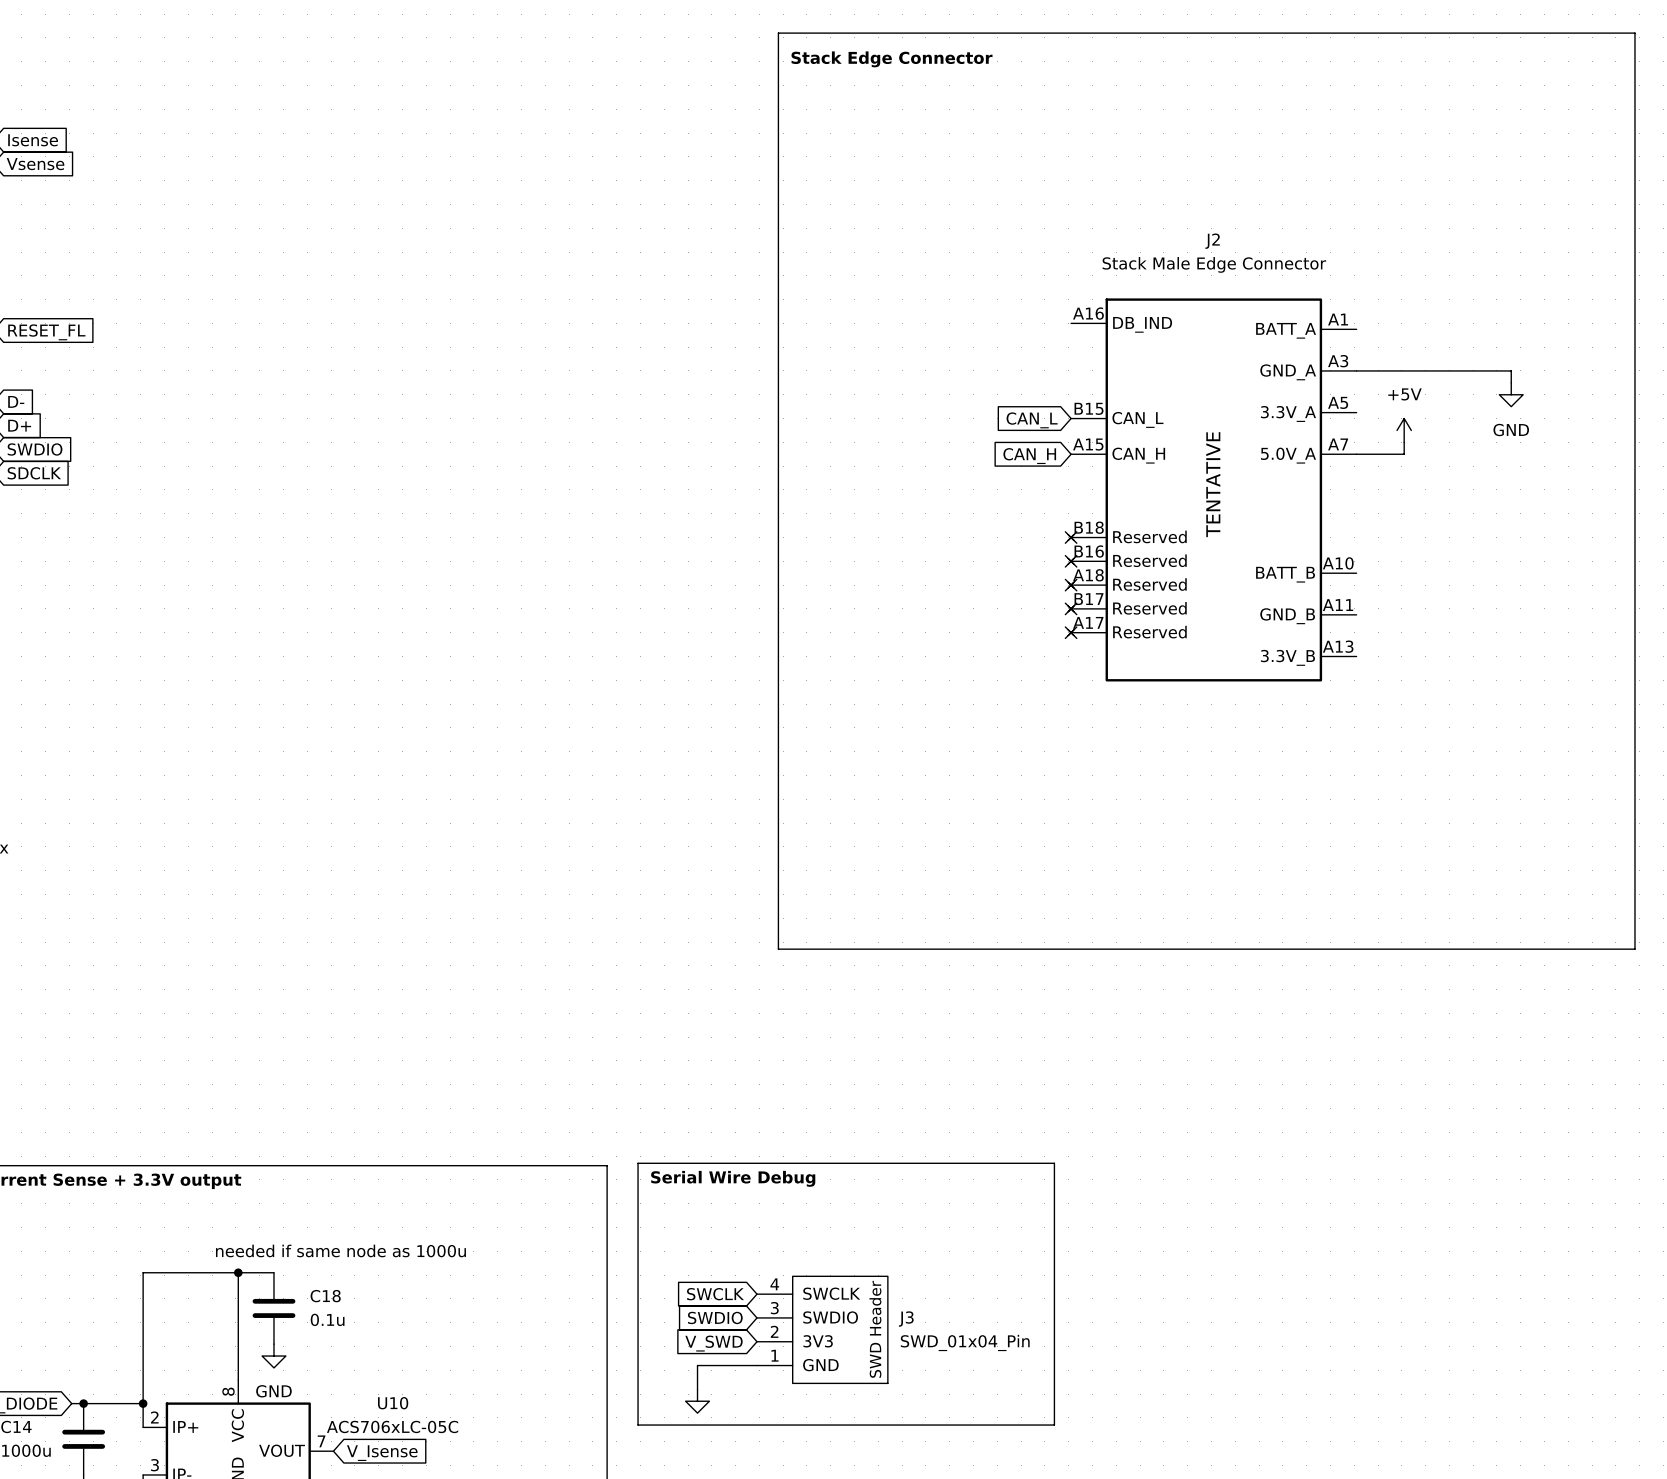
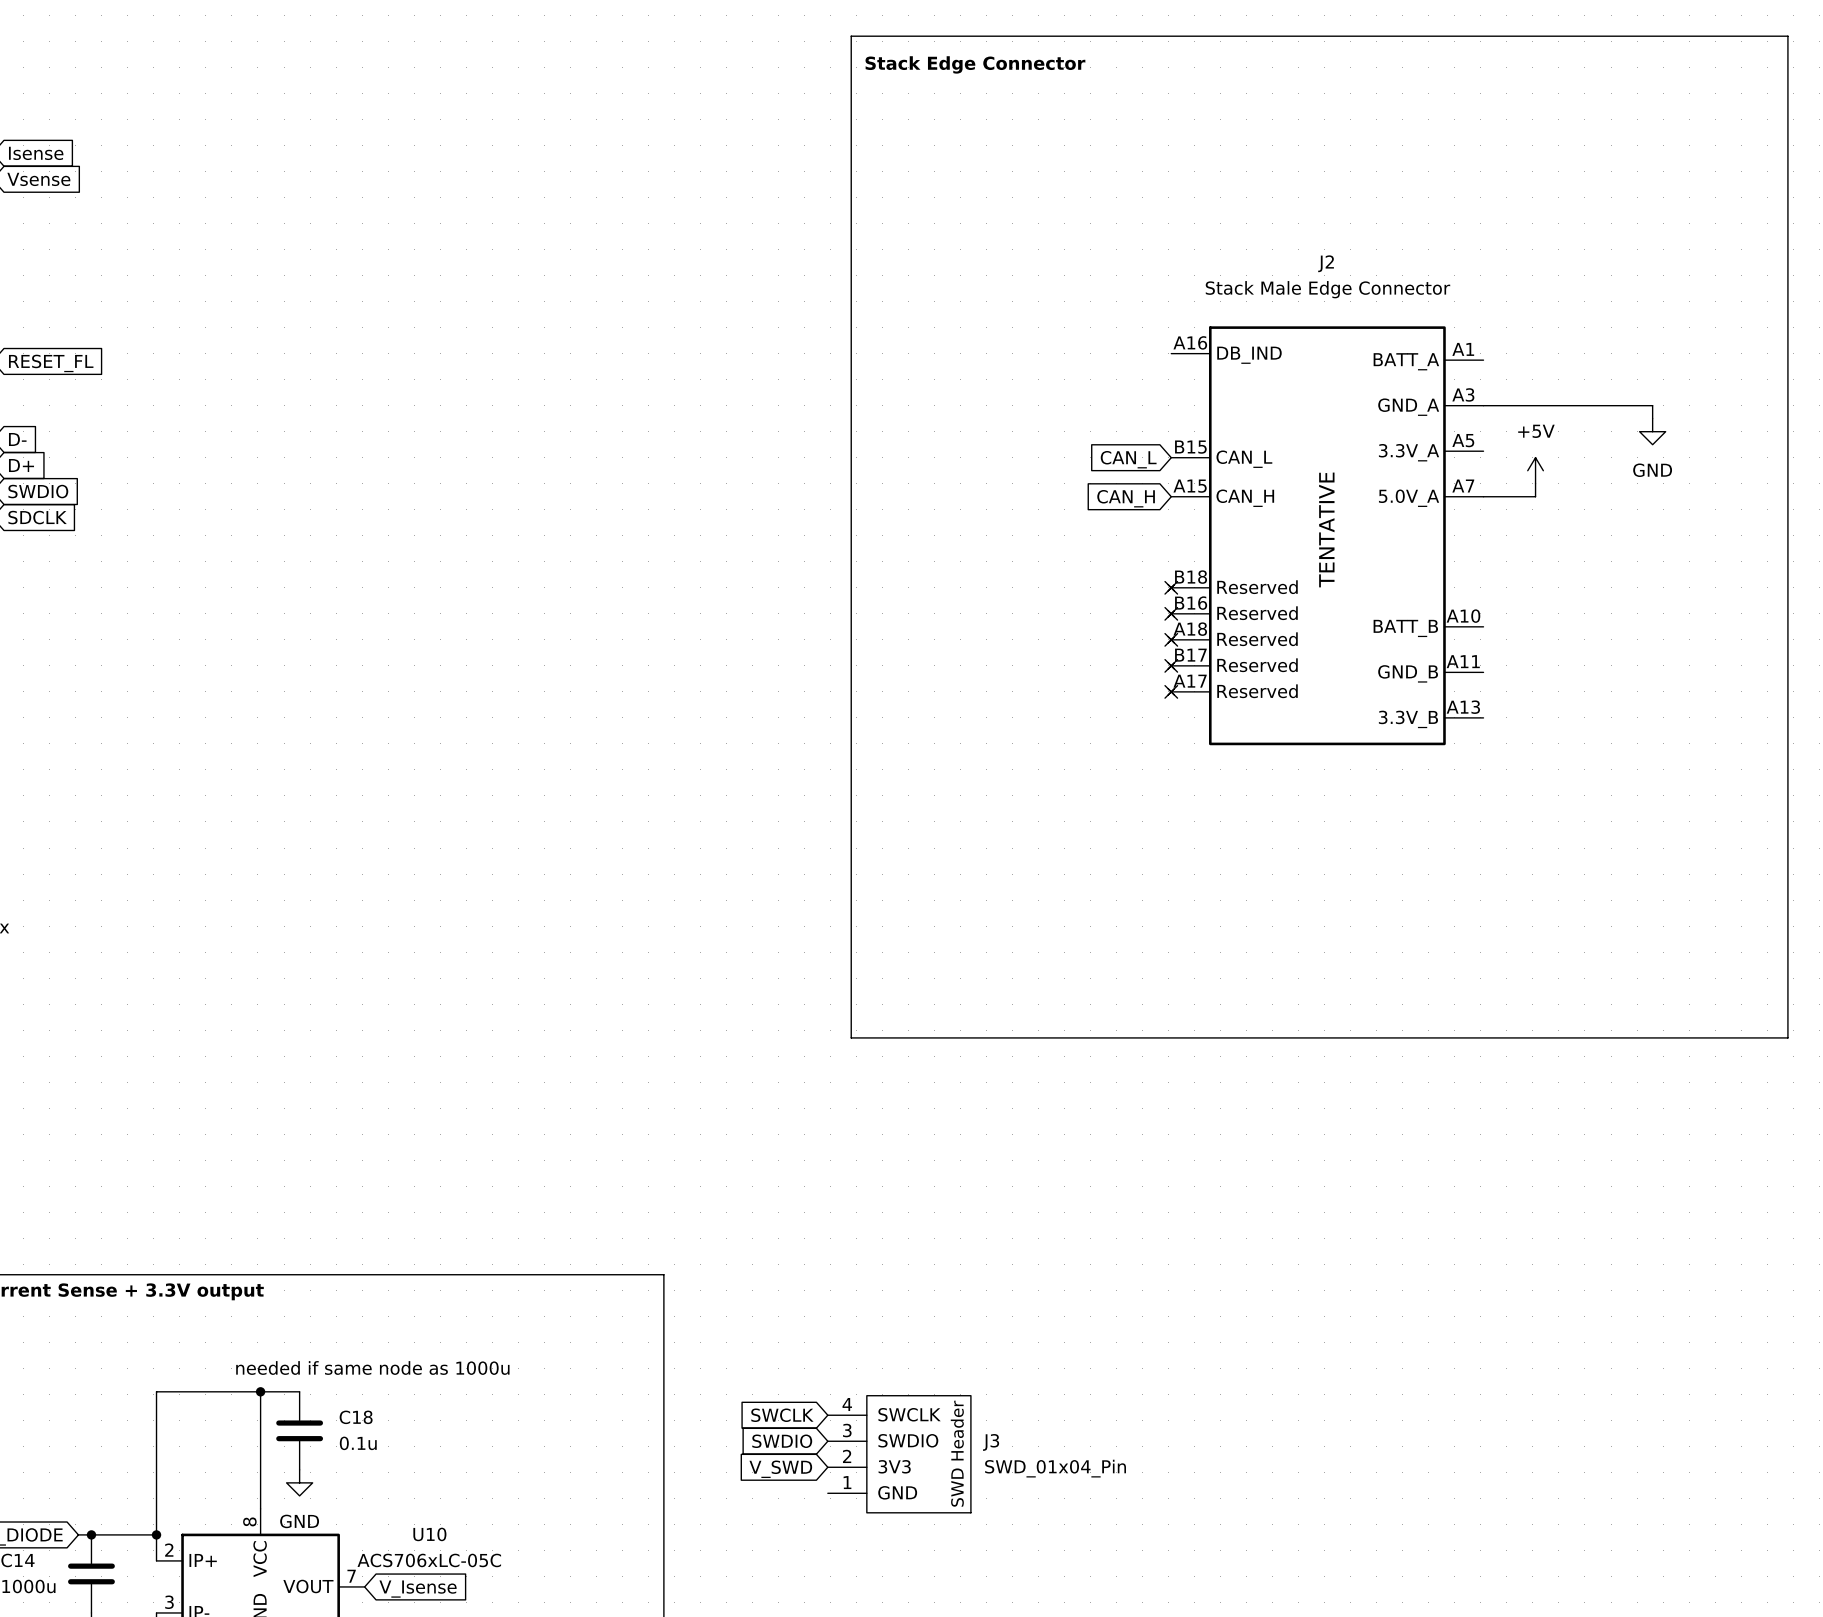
line: (638, 1163) (638, 1425) (1054, 1425) (1054, 1163) (638, 1163) -> none
text: Serial Wire Debug (733, 1178) -> none
wire: (757, 1365) (697, 1365) (697, 1389) -> none
power symbol: (697, 1401) -> none

